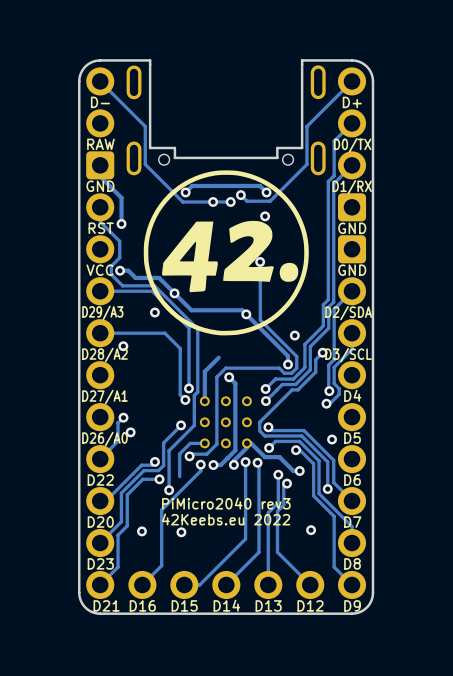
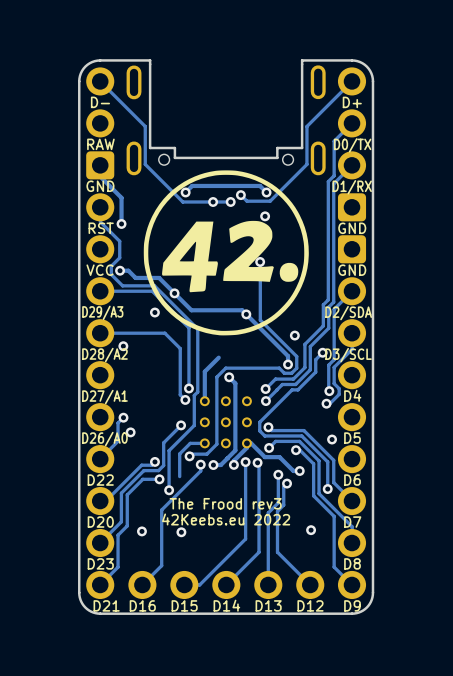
text: PiMicro2040 rev3 (226, 503) -> The Frood rev3 (225, 503)

